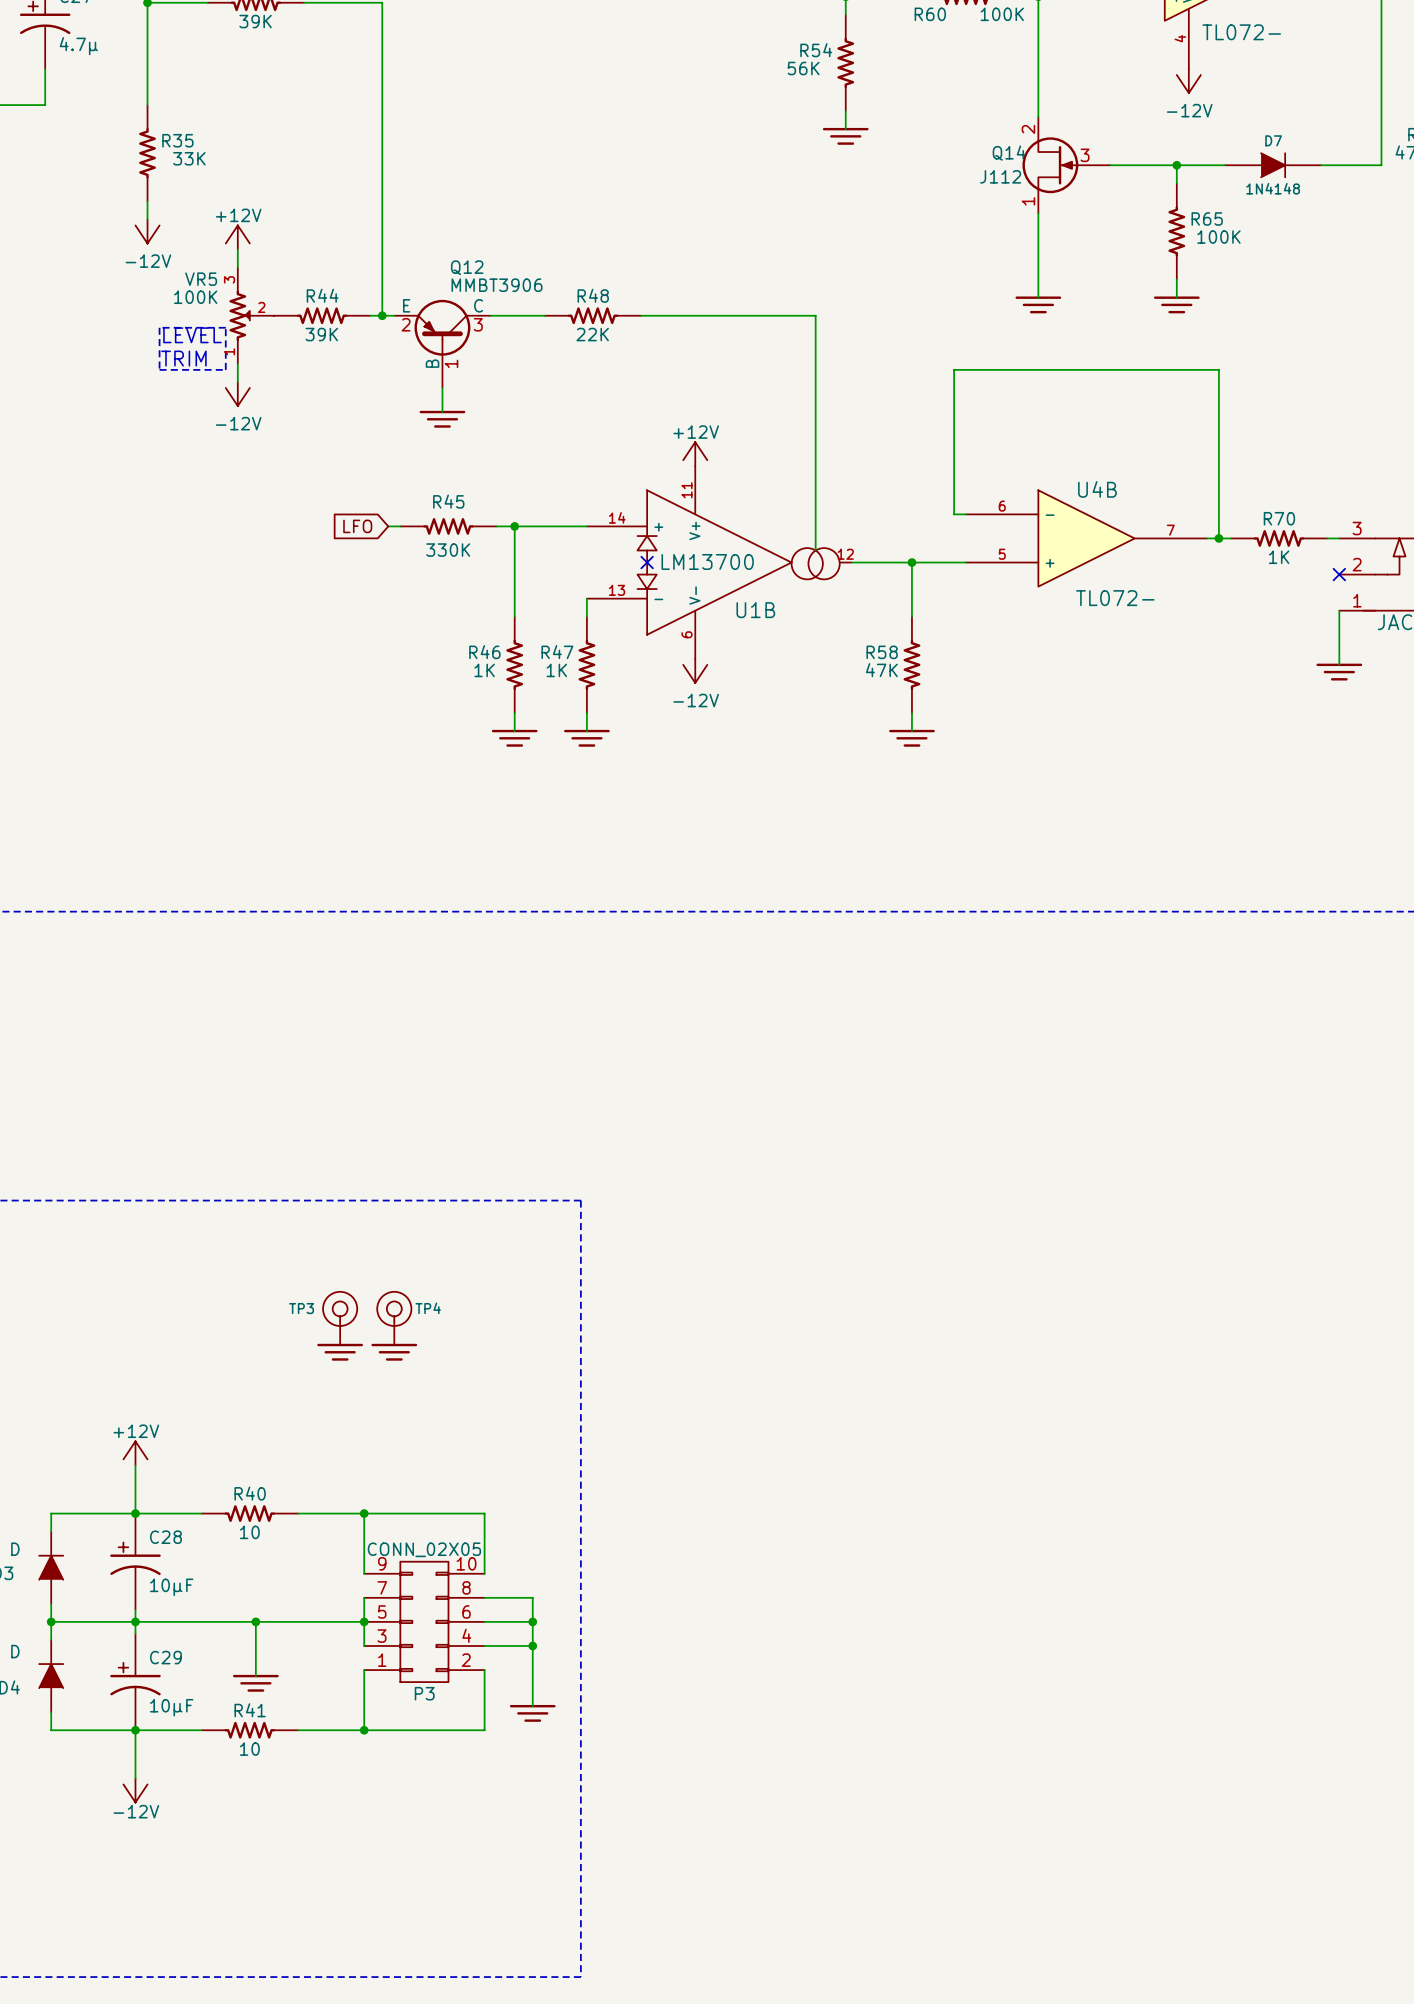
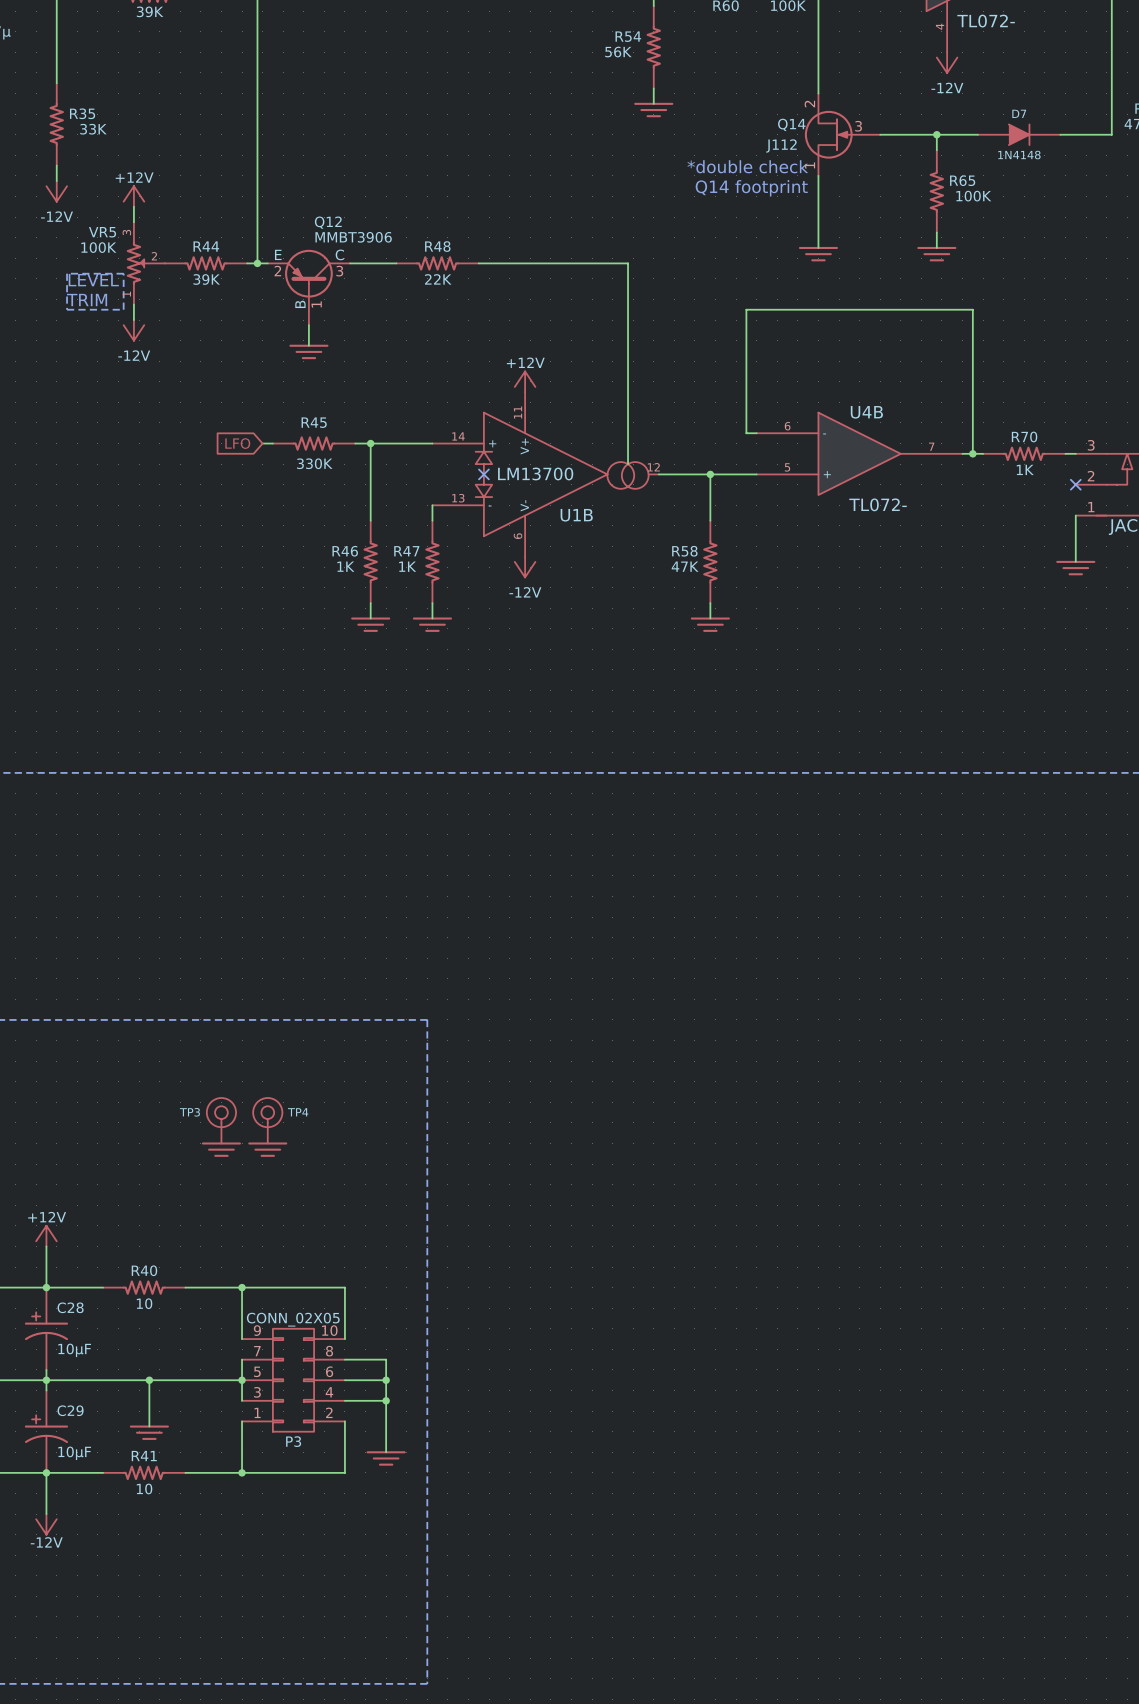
text: none -> *double check (747, 166)
text: none -> Q14 footprint (751, 188)

